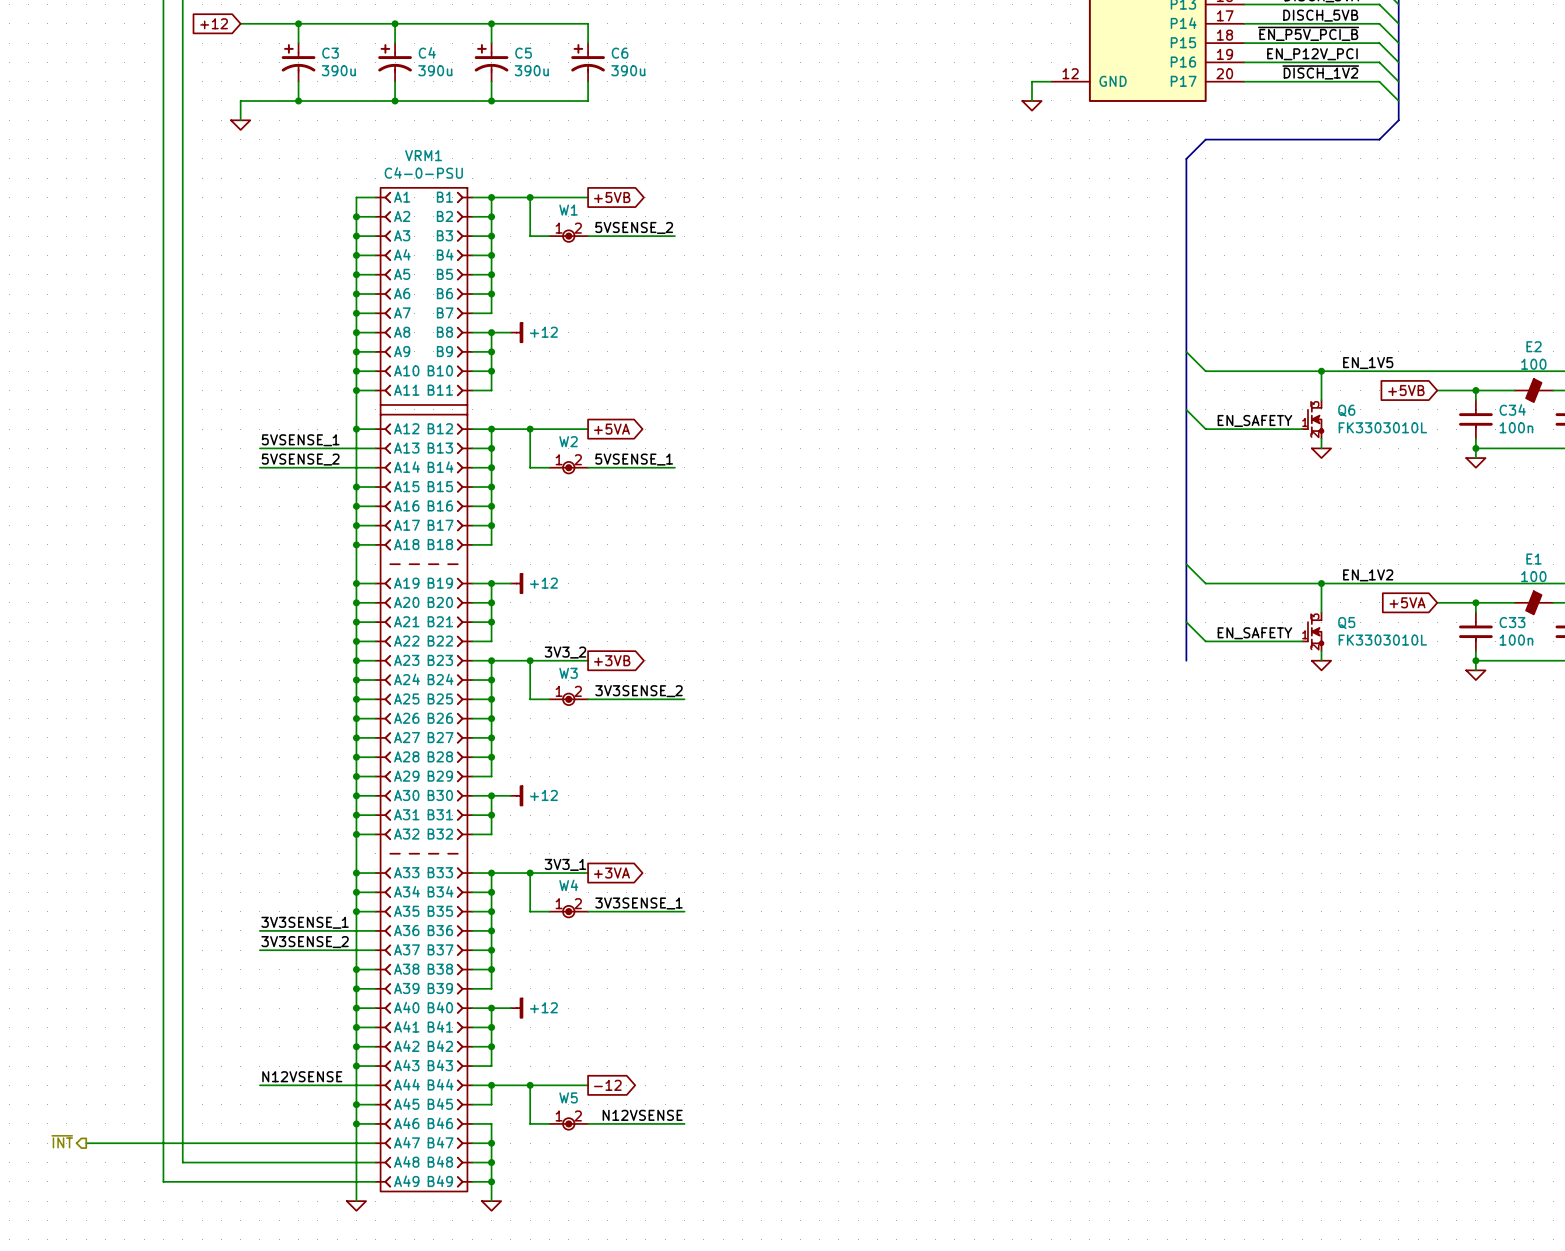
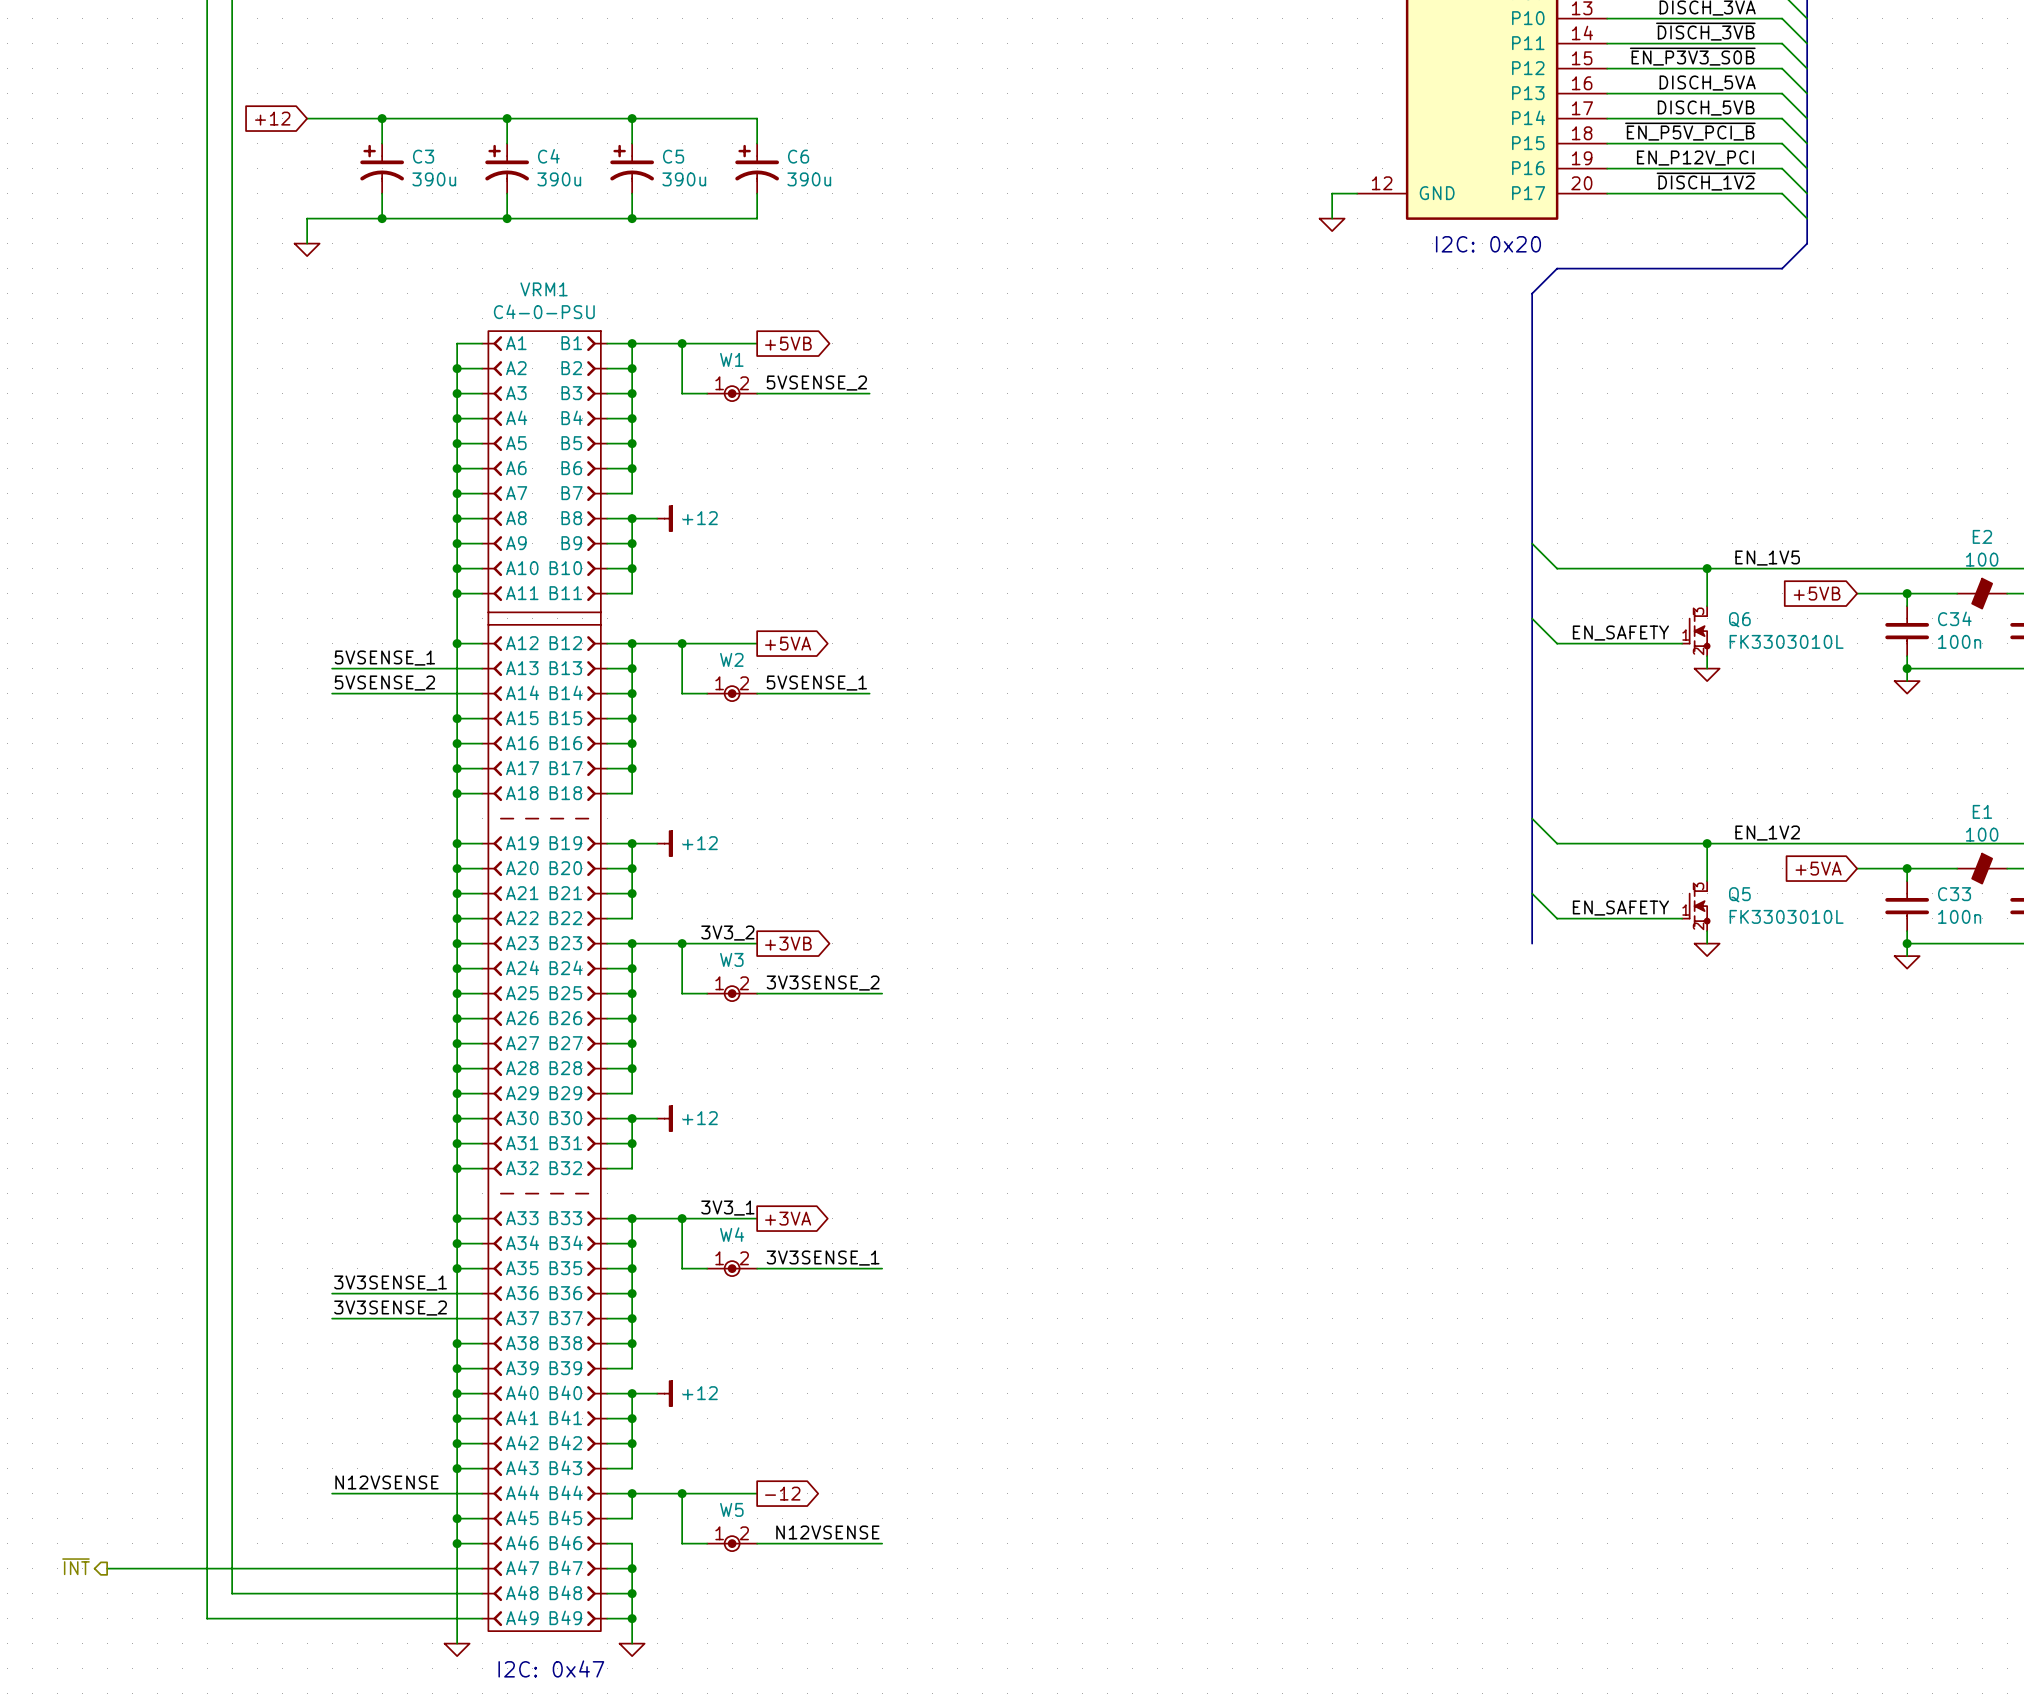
text: none -> I2C: 0x20 (1488, 244)
text: none -> I2C: 0x47 (551, 1668)

